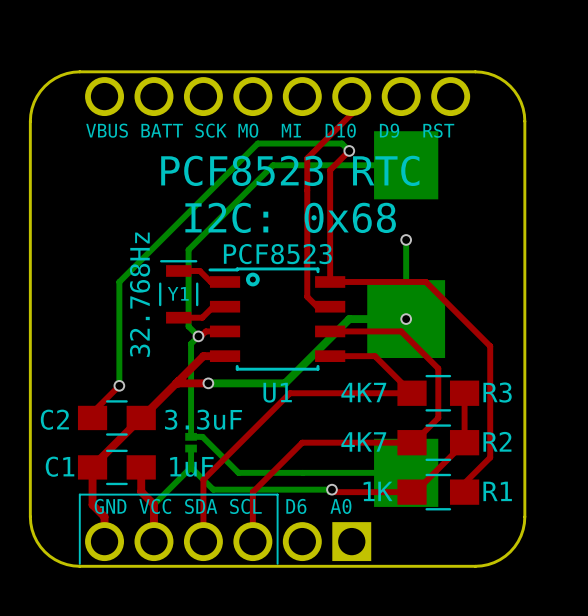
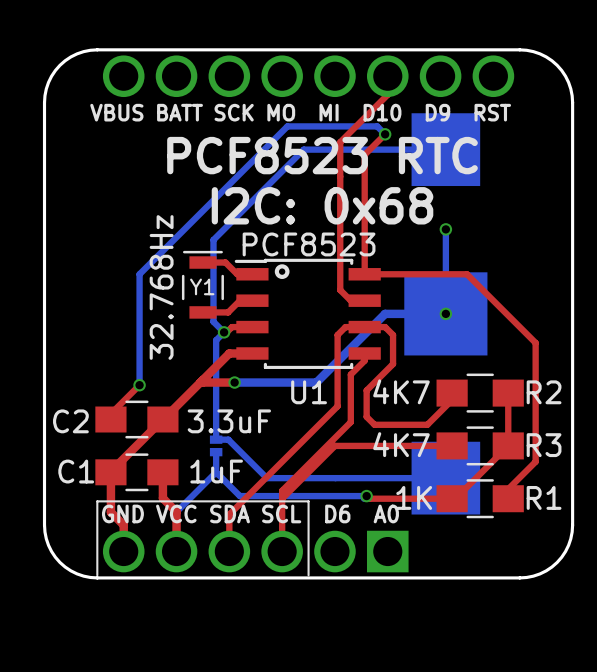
top track: (349, 331) (401, 331) (438, 368) (438, 417) (412, 442) -> (385, 327) (393, 335) (393, 364) (366, 390) (366, 416) (374, 424) (427, 424) (452, 400) (452, 393)
top track: (330, 356) (374, 356) (412, 393) (289, 393) (203, 479) (203, 506) -> (364, 327) (345, 327) (337, 335) (337, 406) (229, 514)
top track: none -> (364, 353) (364, 360) (350, 374) (350, 422) (282, 490) (282, 498)
R3 name: R3 (497, 392) -> R2 (544, 392)
R2 name: R2 (497, 441) -> R3 (544, 445)

